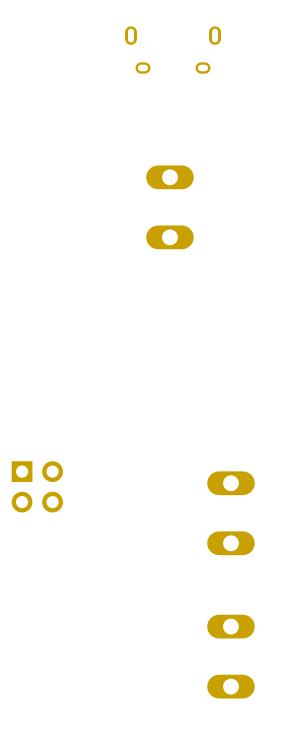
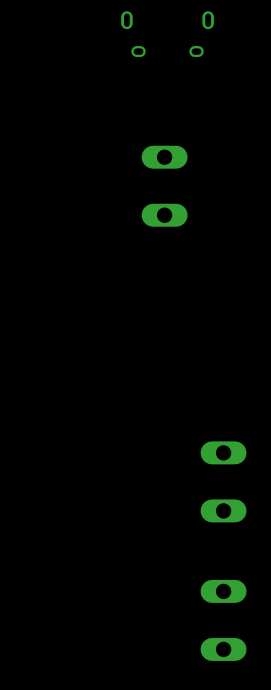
part: (37, 486) -> none

